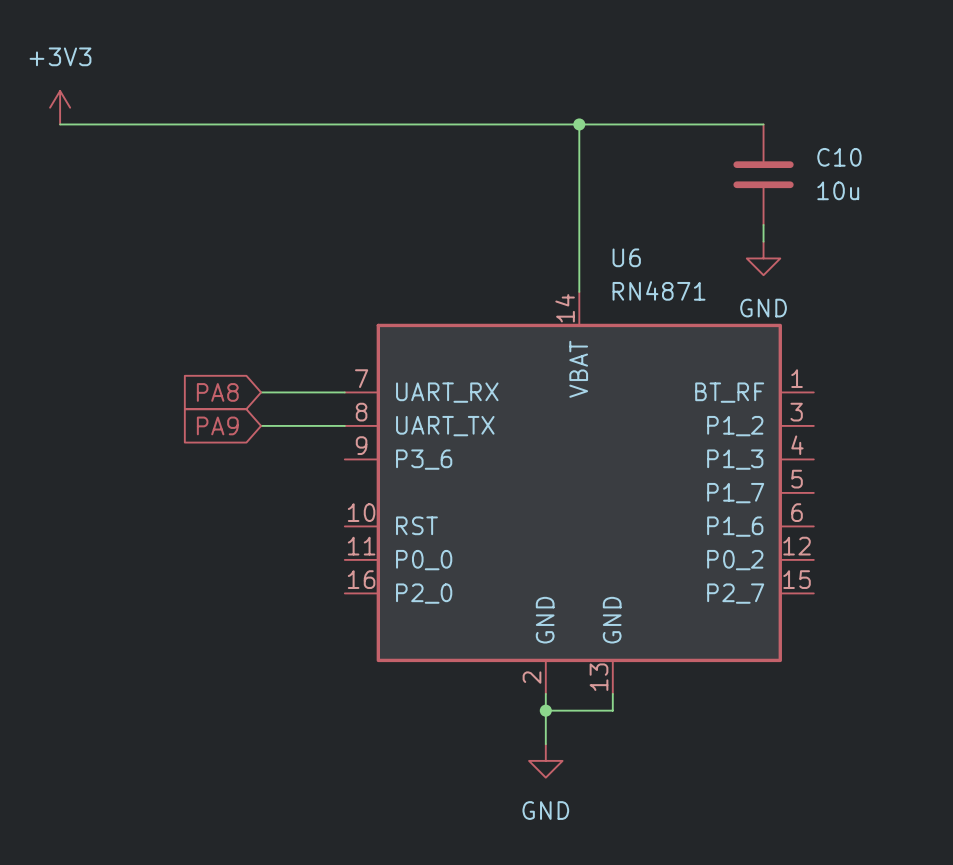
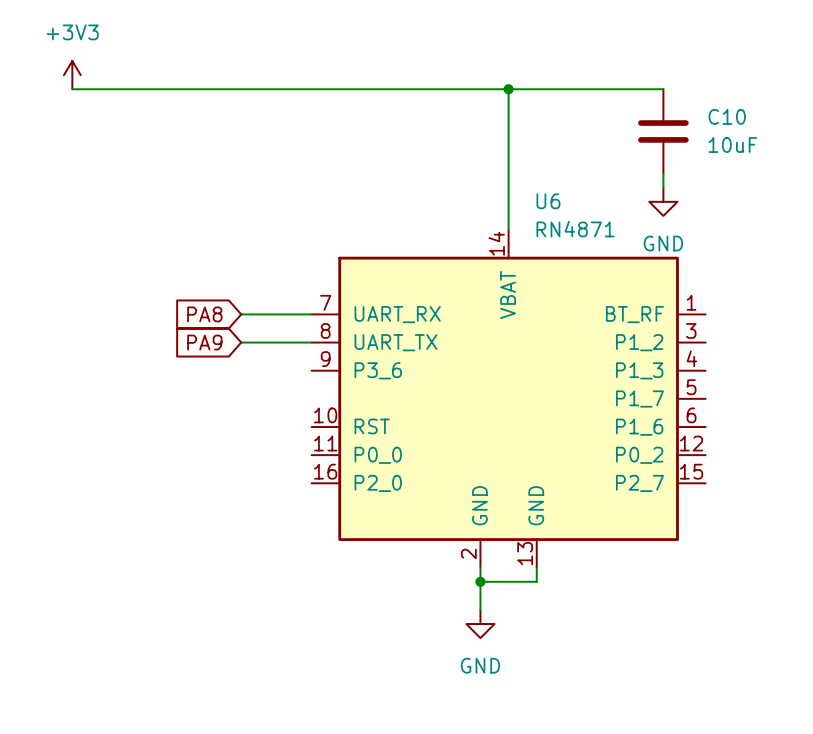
C10 value: 10u (838, 190) -> 10uF (732, 145)

